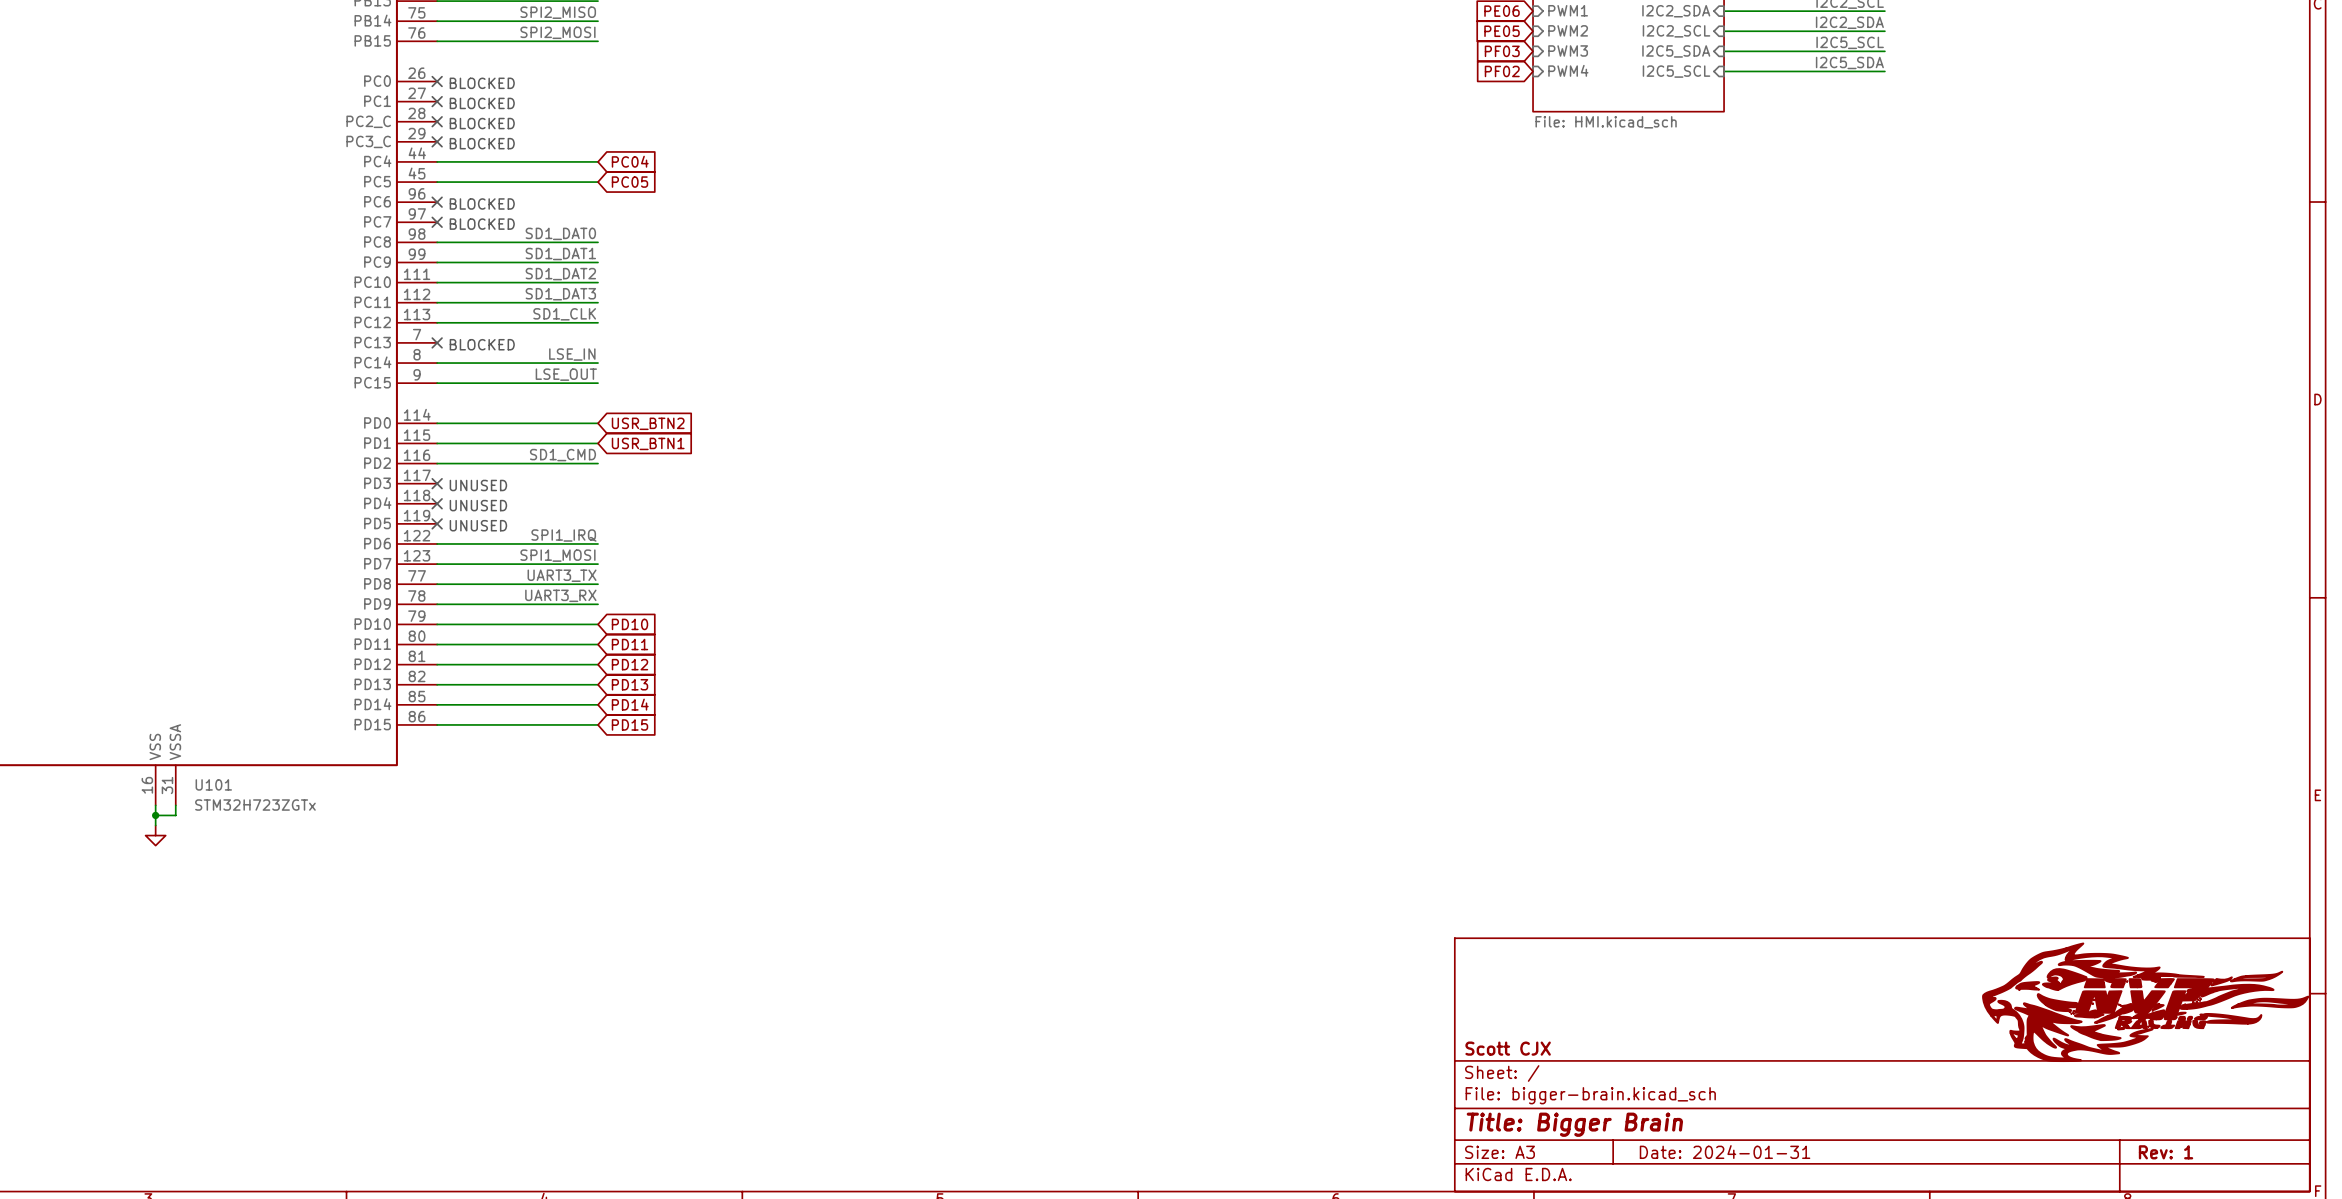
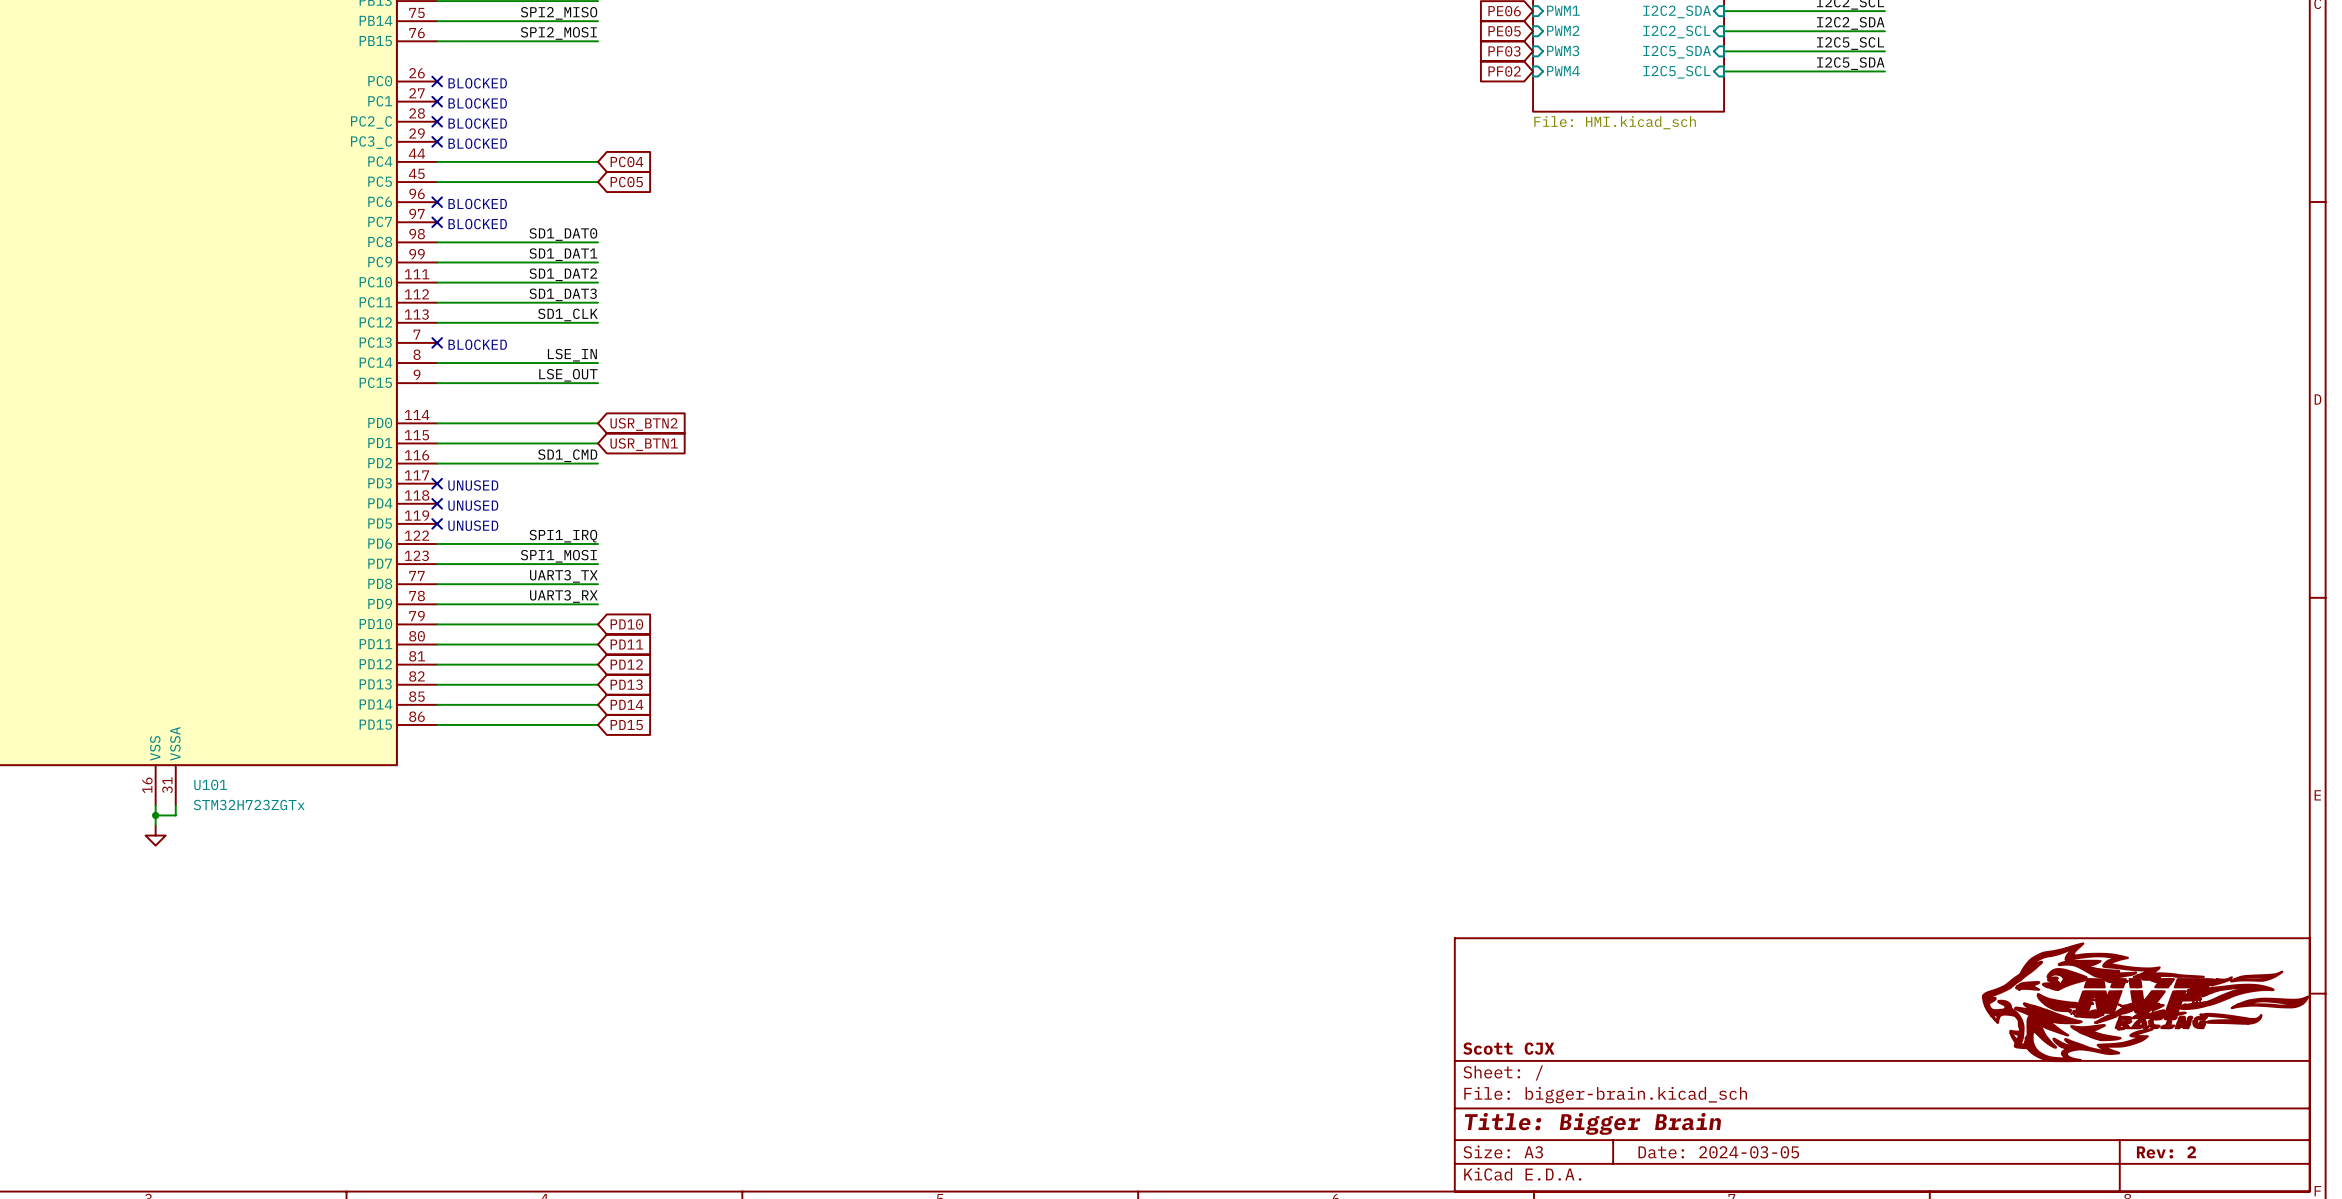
title block: Date: 2024-01-31 (1725, 1152) -> Date: 2024-03-05 (1718, 1152)
title block: Rev: 1 (2166, 1152) -> Rev: 2 (2166, 1152)

